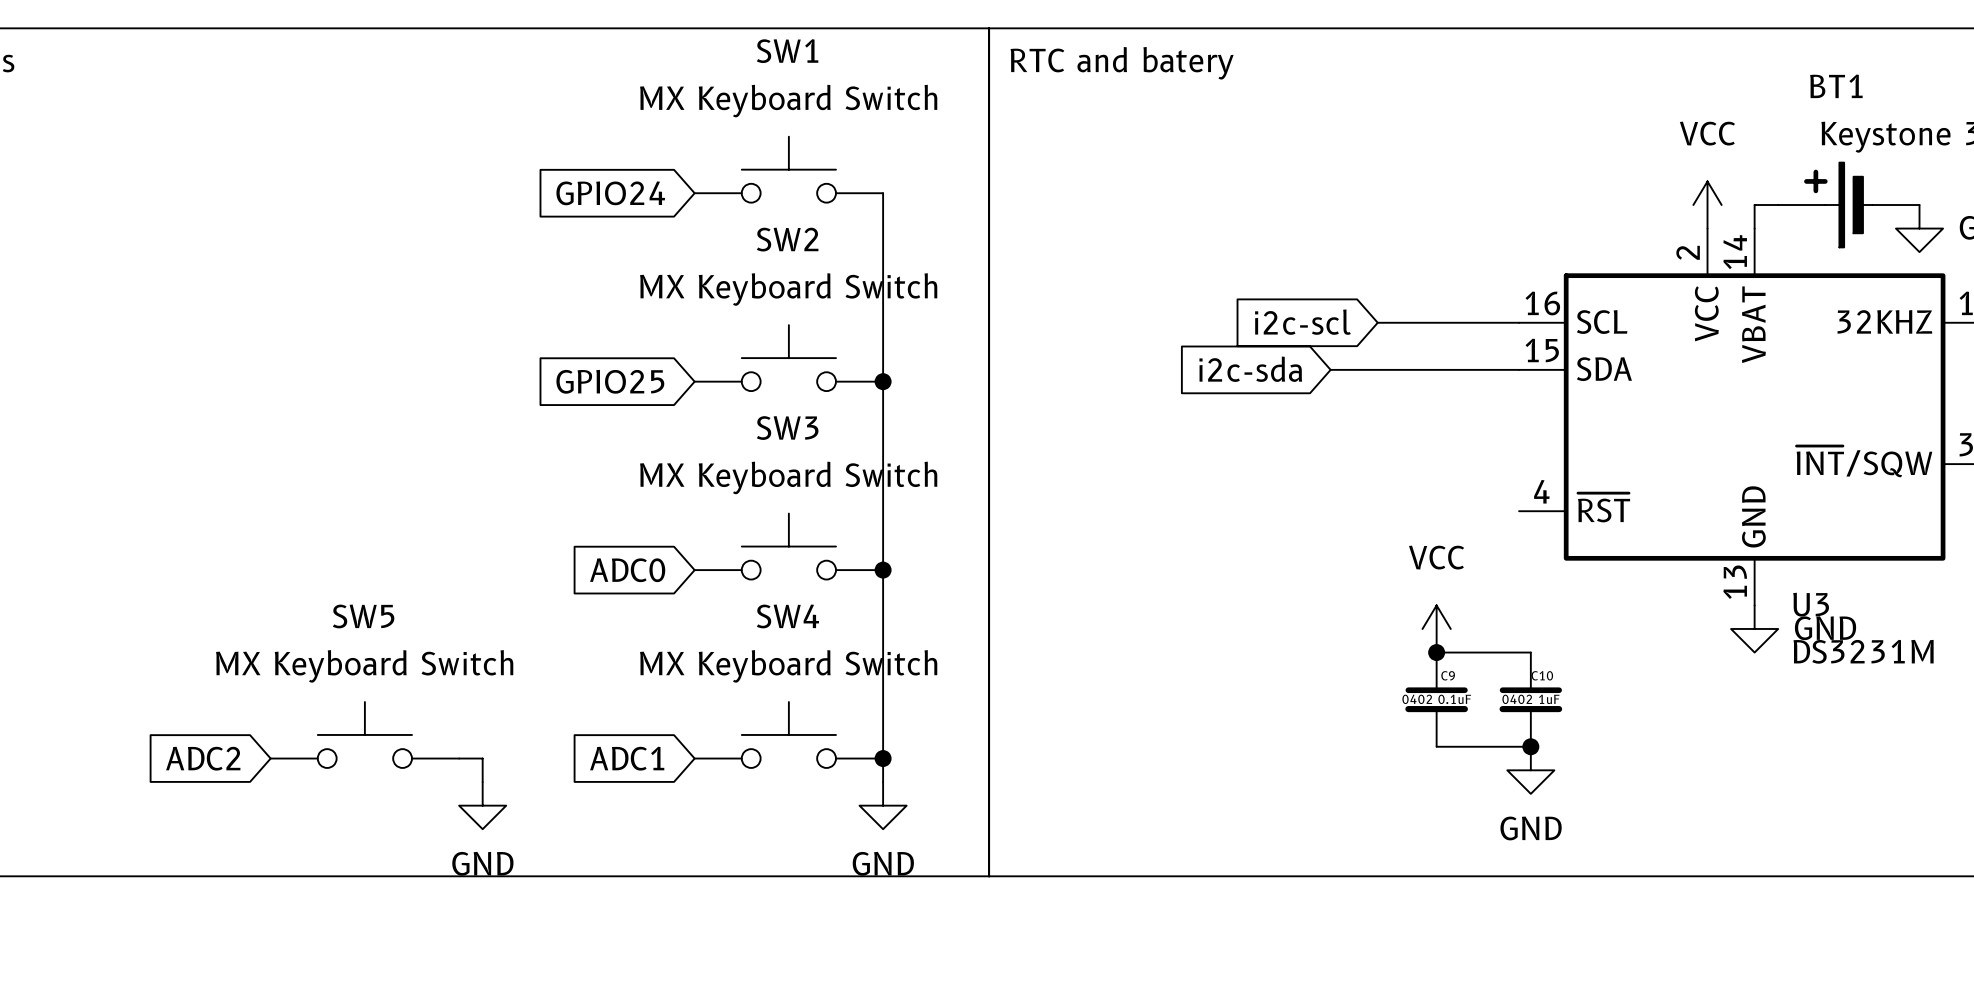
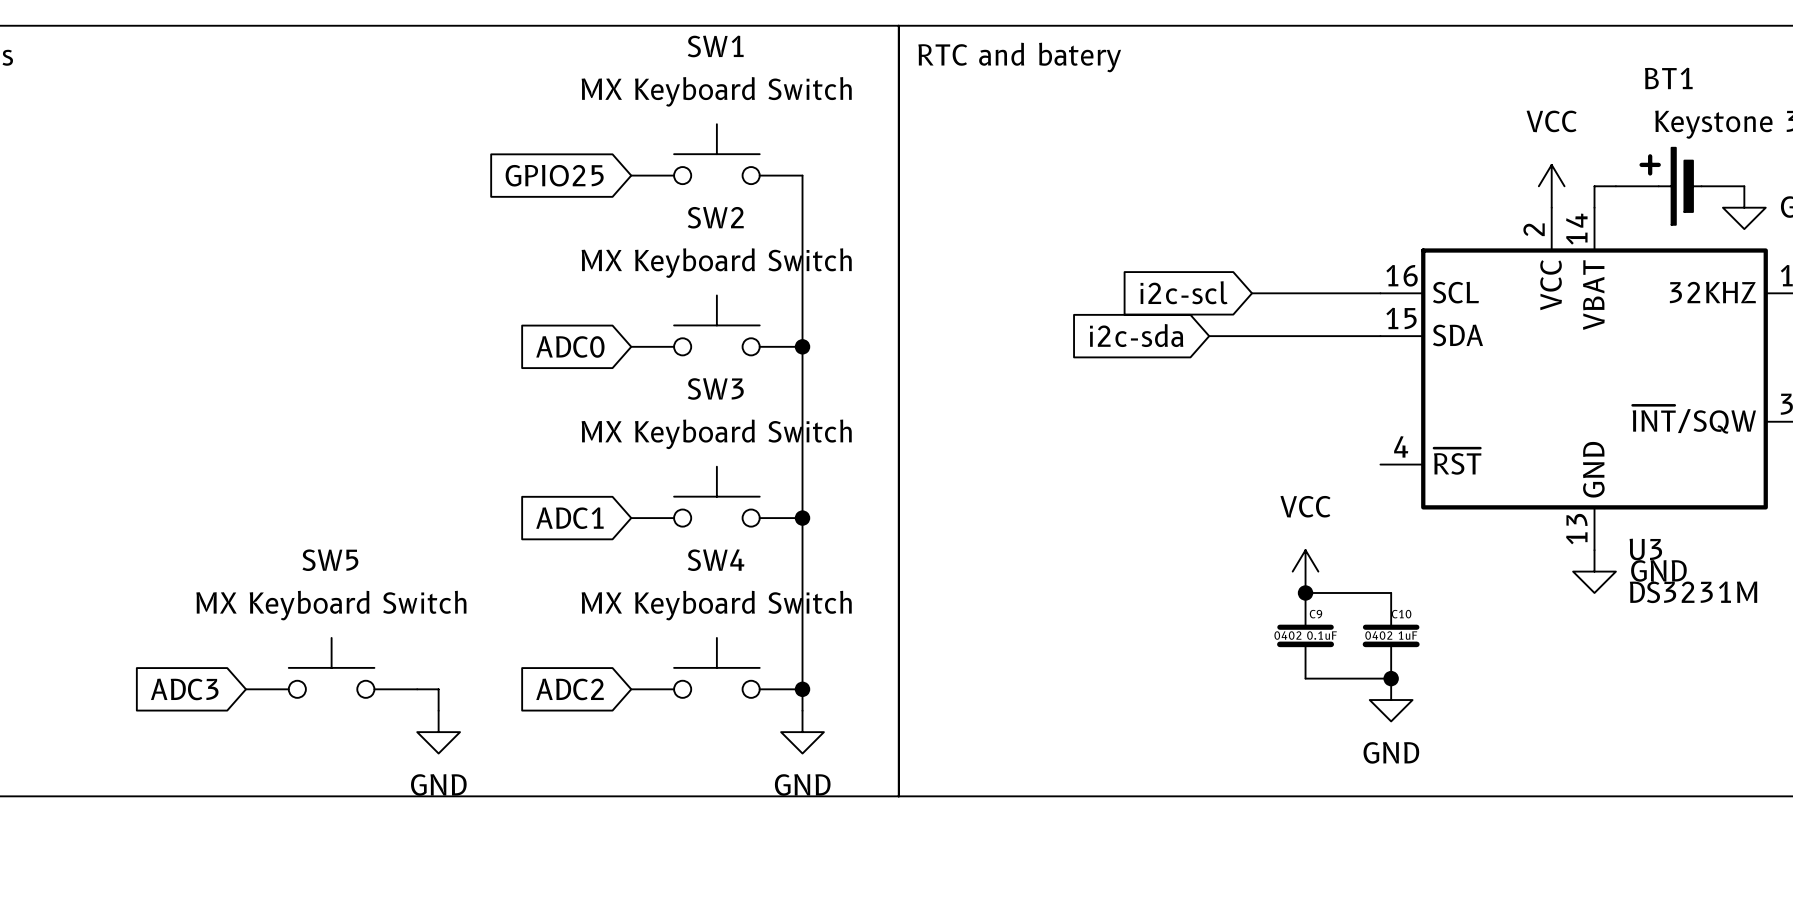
global label: GPIO24 (610, 193) -> GPIO25 (554, 175)
global label: GPIO25 (610, 381) -> ADC0 (570, 346)
global label: ADC0 (627, 570) -> ADC1 (569, 518)
global label: ADC2 (203, 758) -> ADC3 (184, 689)
global label: ADC1 (627, 758) -> ADC2 (570, 689)

